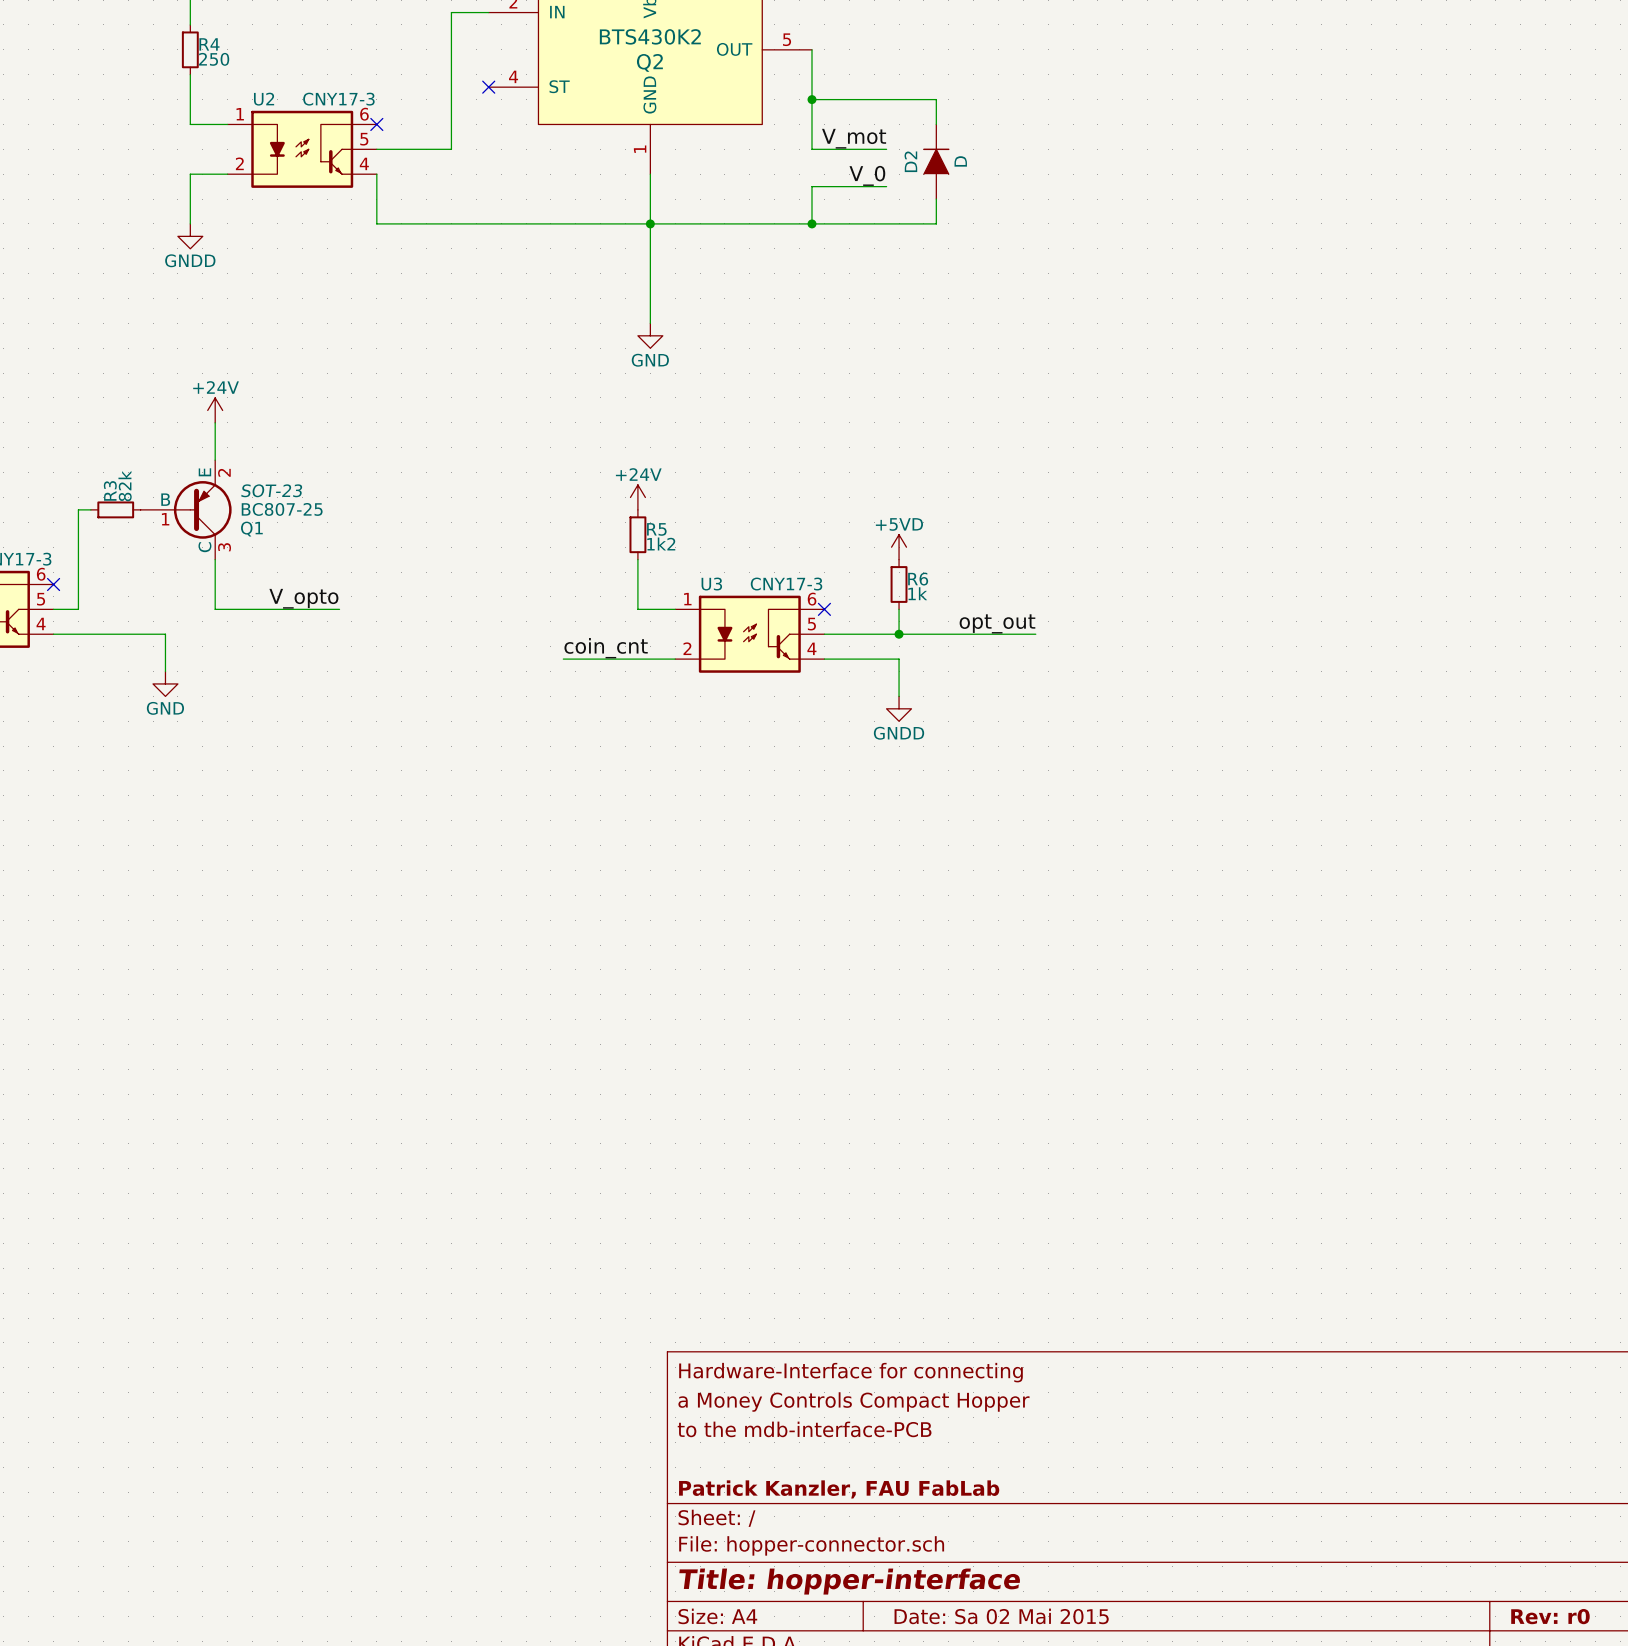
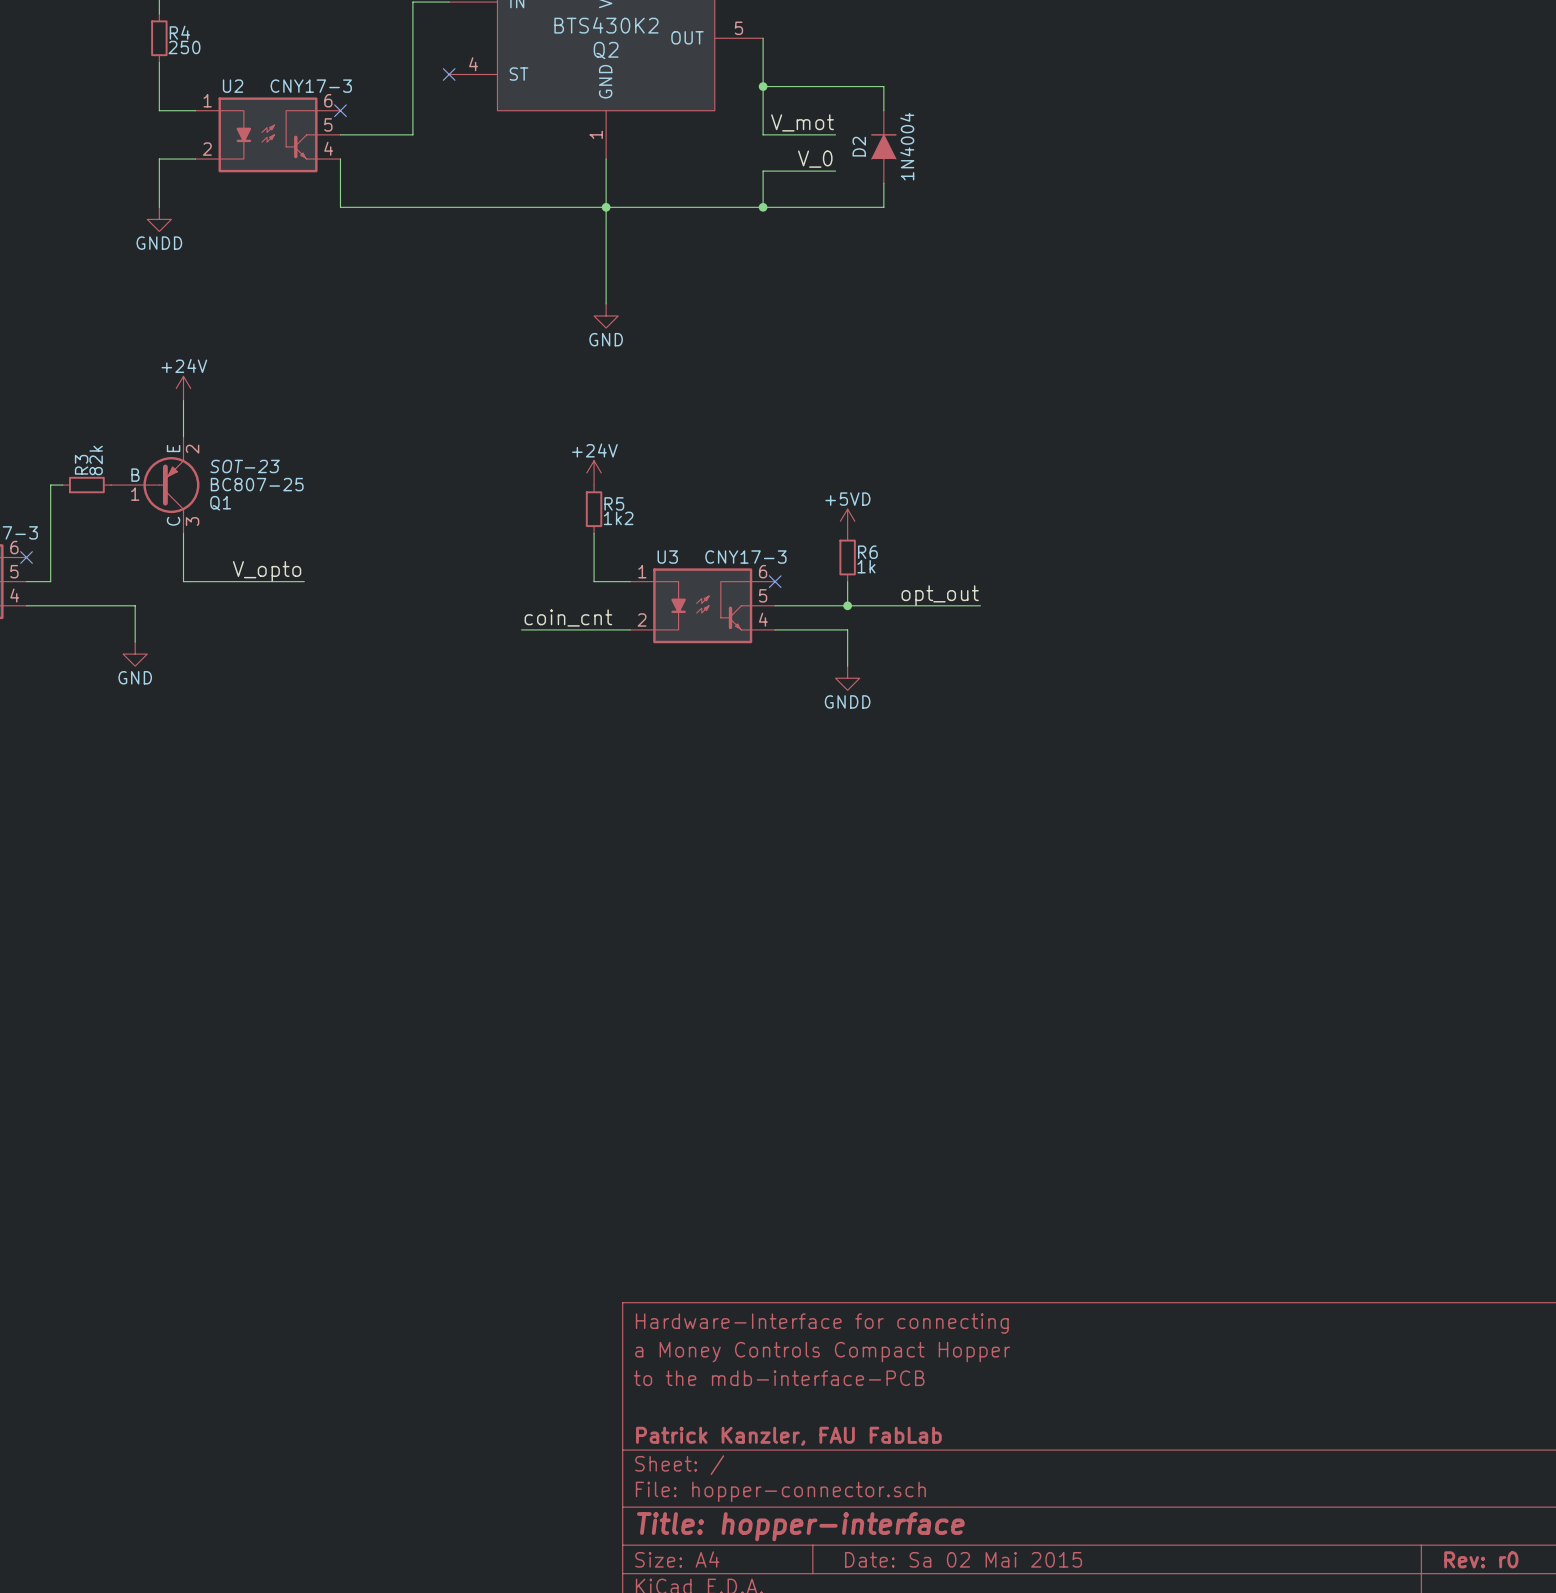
D2 value: D (960, 161) -> 1N4004 (907, 146)

